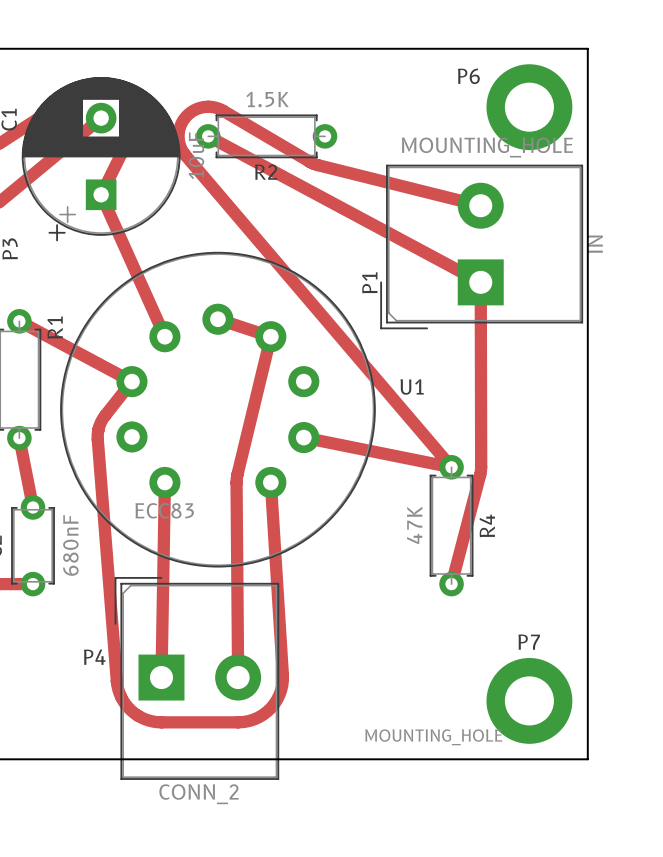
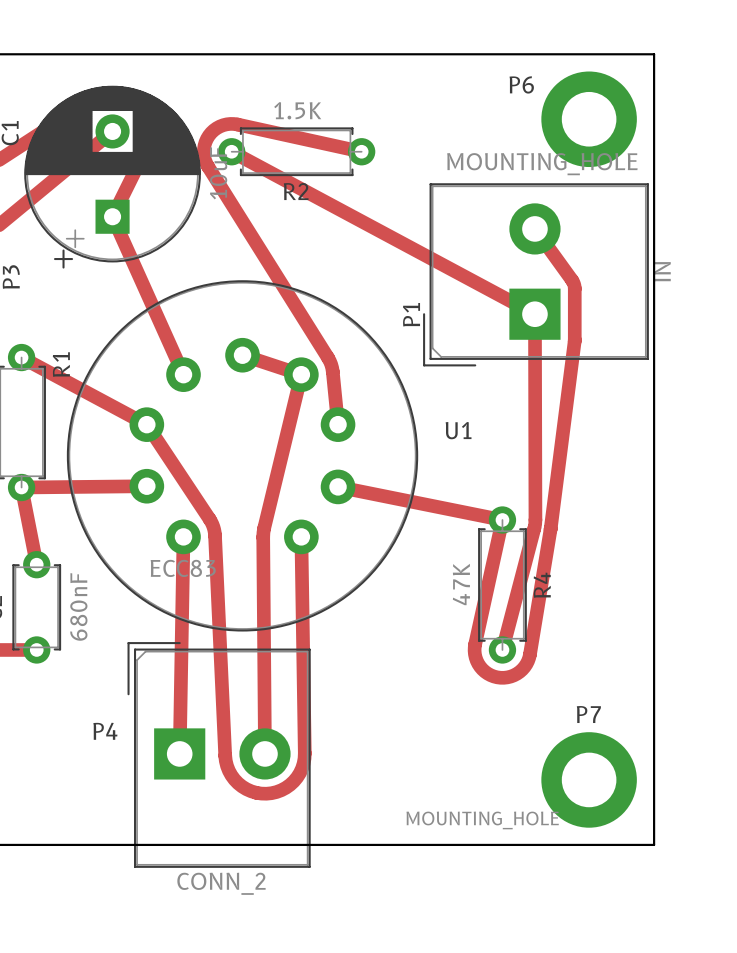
track: none -> (361, 151) (230, 123) (213, 130) (207, 138) (203, 149) (208, 166) (329, 361) (332, 371) (338, 424)
track: (309, 161) (216, 107) (204, 106) (194, 110) (185, 116) (179, 129) (179, 143) (184, 154) (451, 467) -> (534, 228) (574, 284) (574, 341) (550, 528) (529, 654) (522, 669) (513, 675) (504, 677) (493, 676) (484, 671) (476, 660) (474, 650) (502, 520)
track: (310, 161) (480, 205) -> none
track: (131, 381) (102, 418) (97, 437) (117, 686) (125, 704) (141, 717) (161, 722) (243, 722) (262, 714) (277, 699) (281, 690) (282, 674) (270, 482) -> (146, 424) (213, 527) (225, 760) (234, 779) (242, 786) (256, 792) (271, 793) (285, 787) (299, 773) (304, 758) (301, 536)
track: none -> (146, 486) (21, 487)

